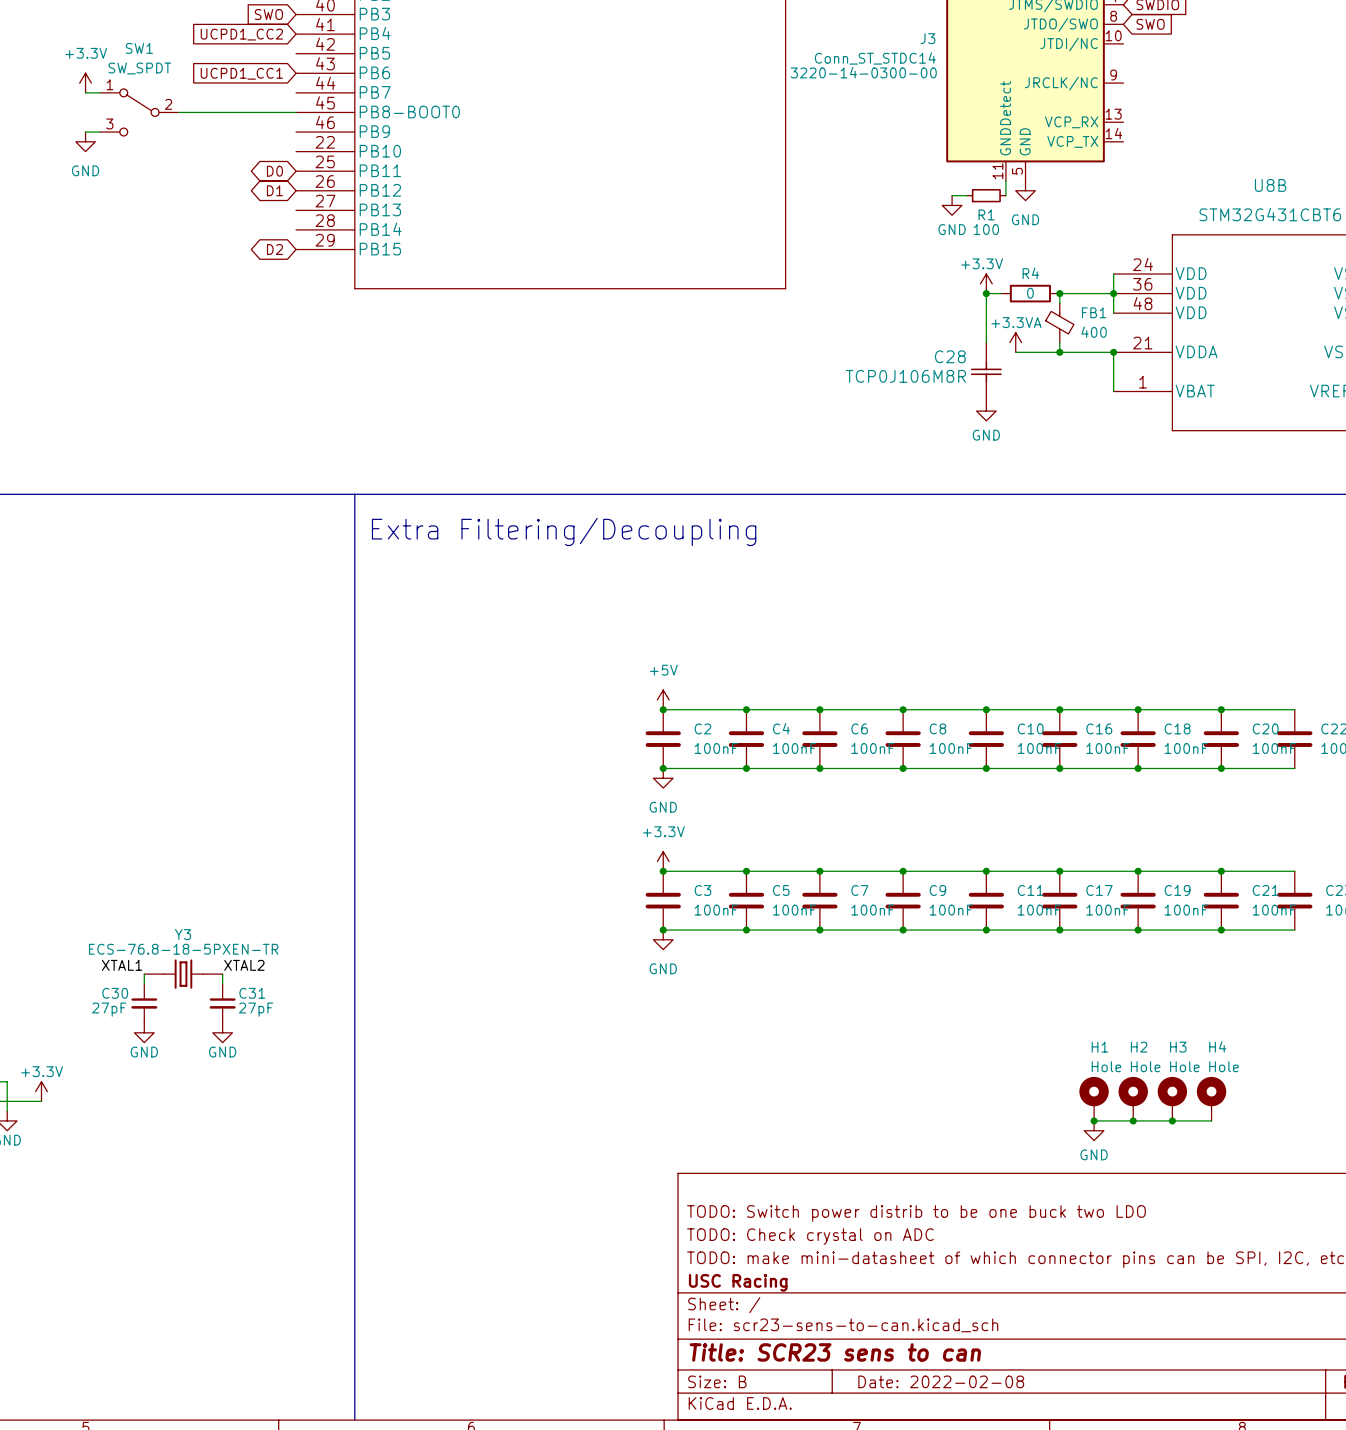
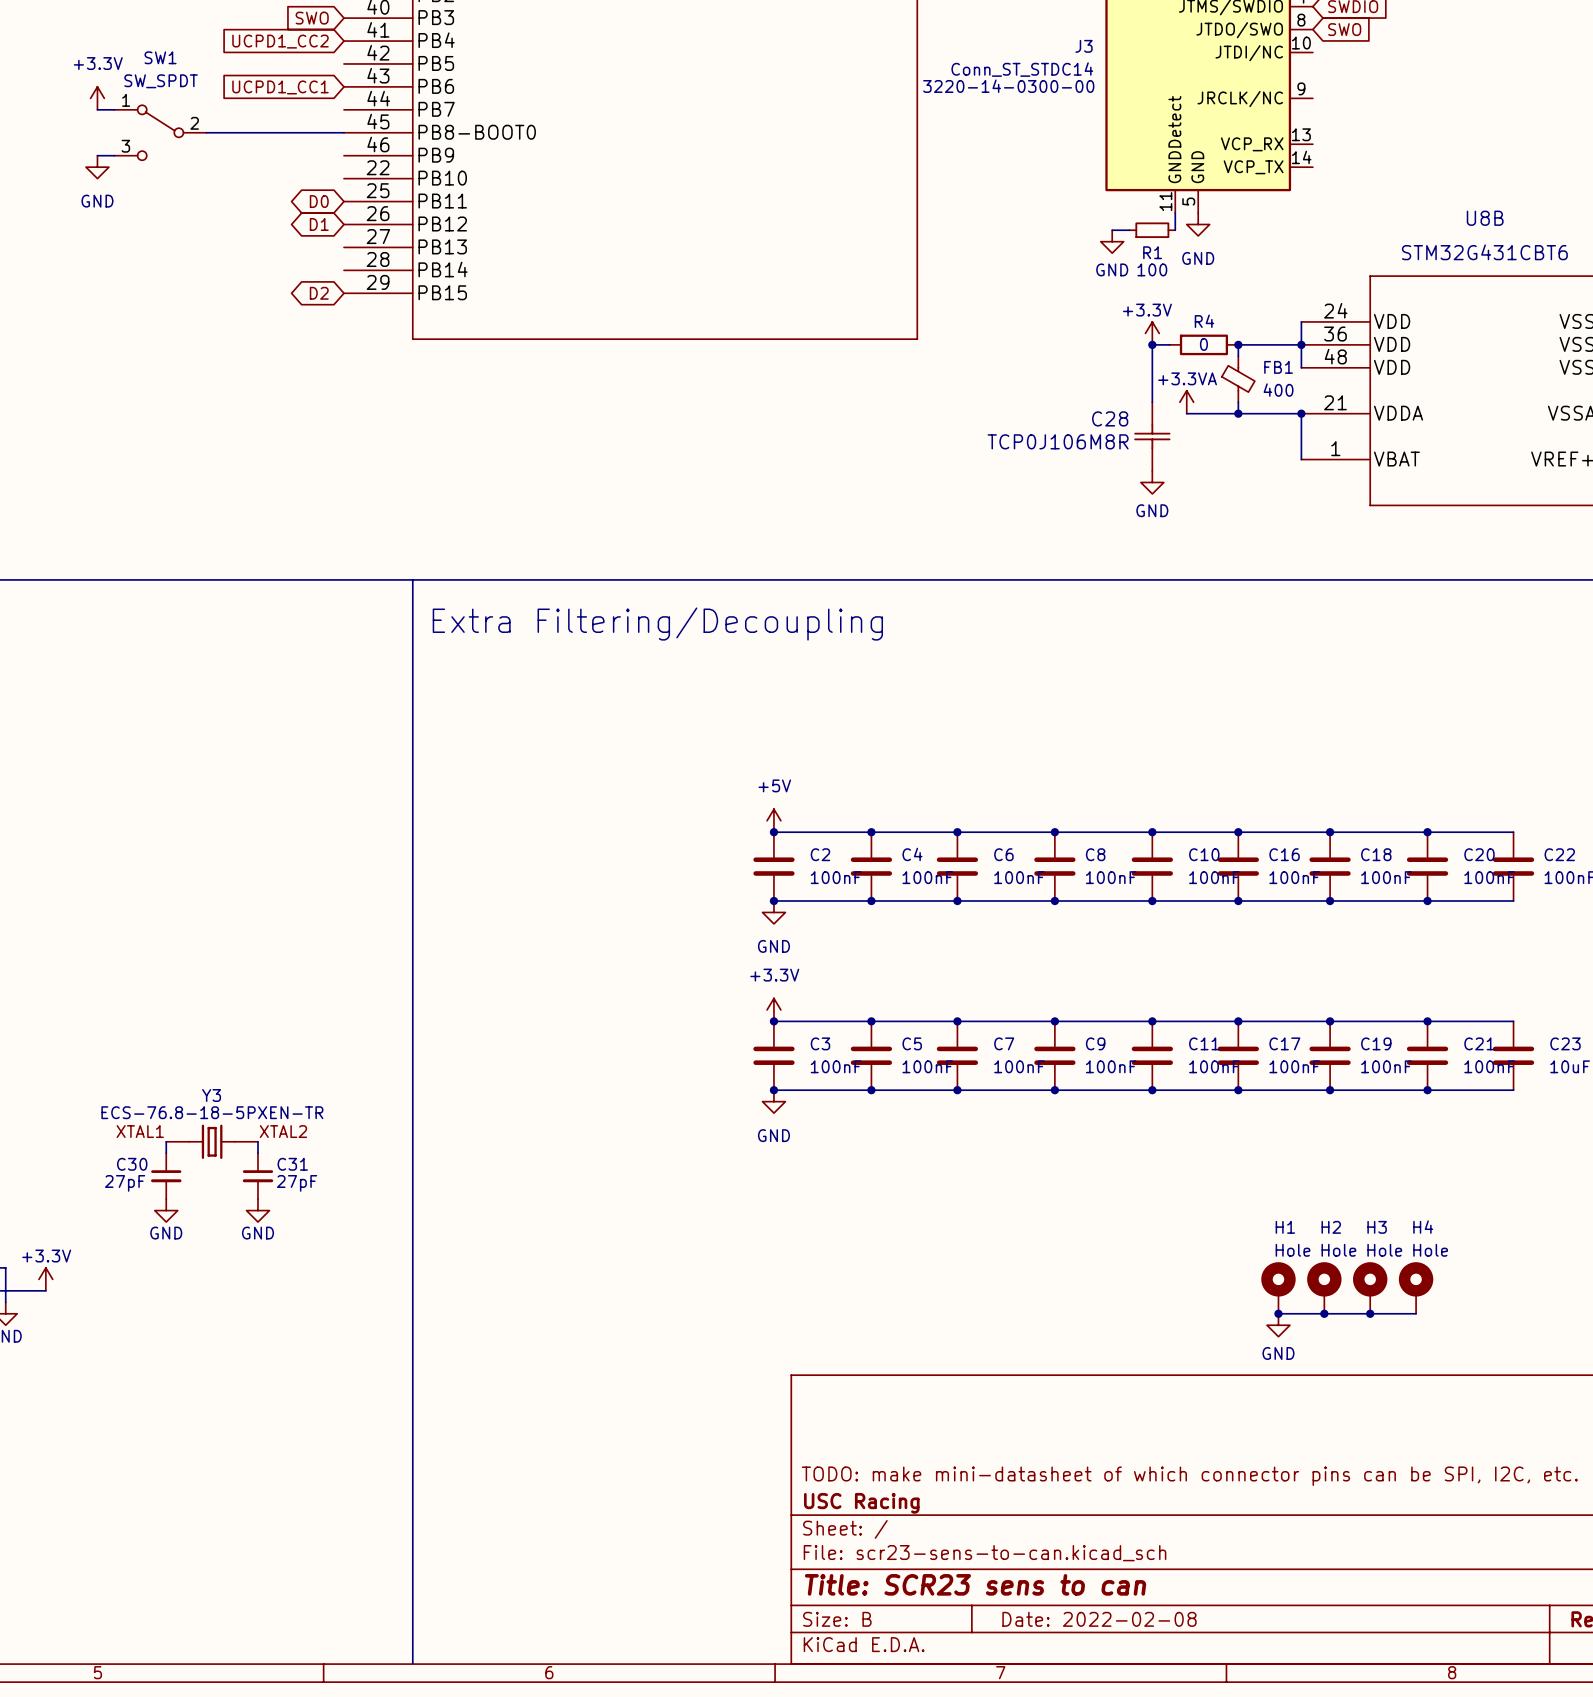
title block: TODO: Switch power distrib to be one buck two LDO (916, 1213) -> none
title block: TODO: Check crystal on ADC (810, 1236) -> none

